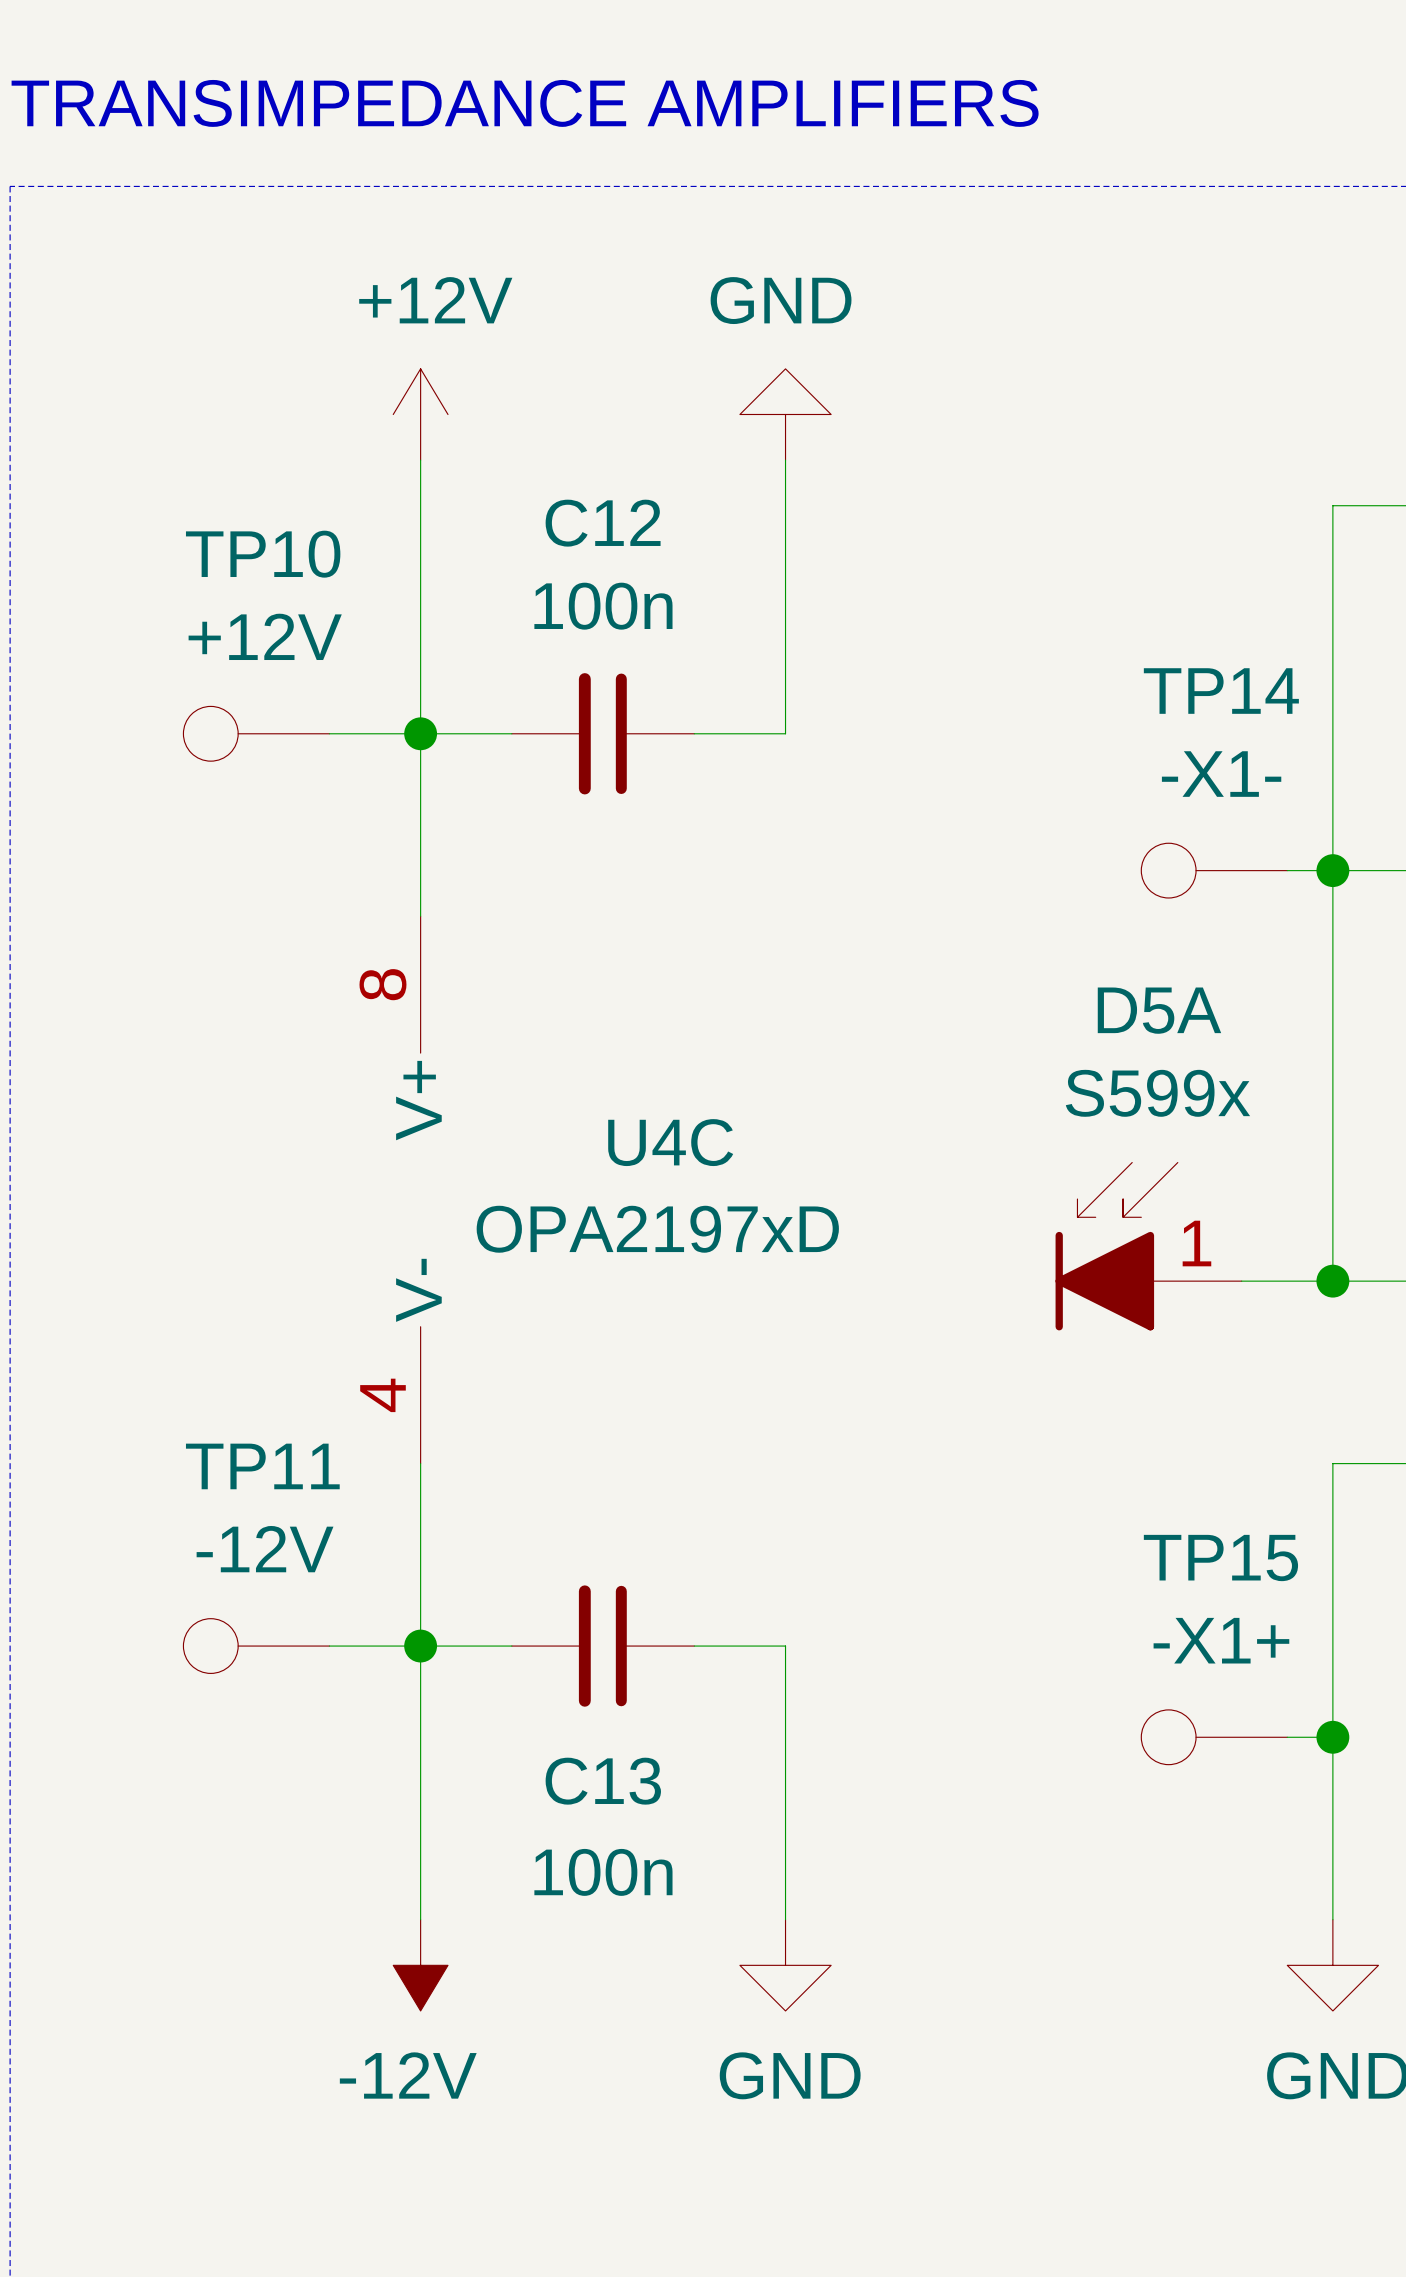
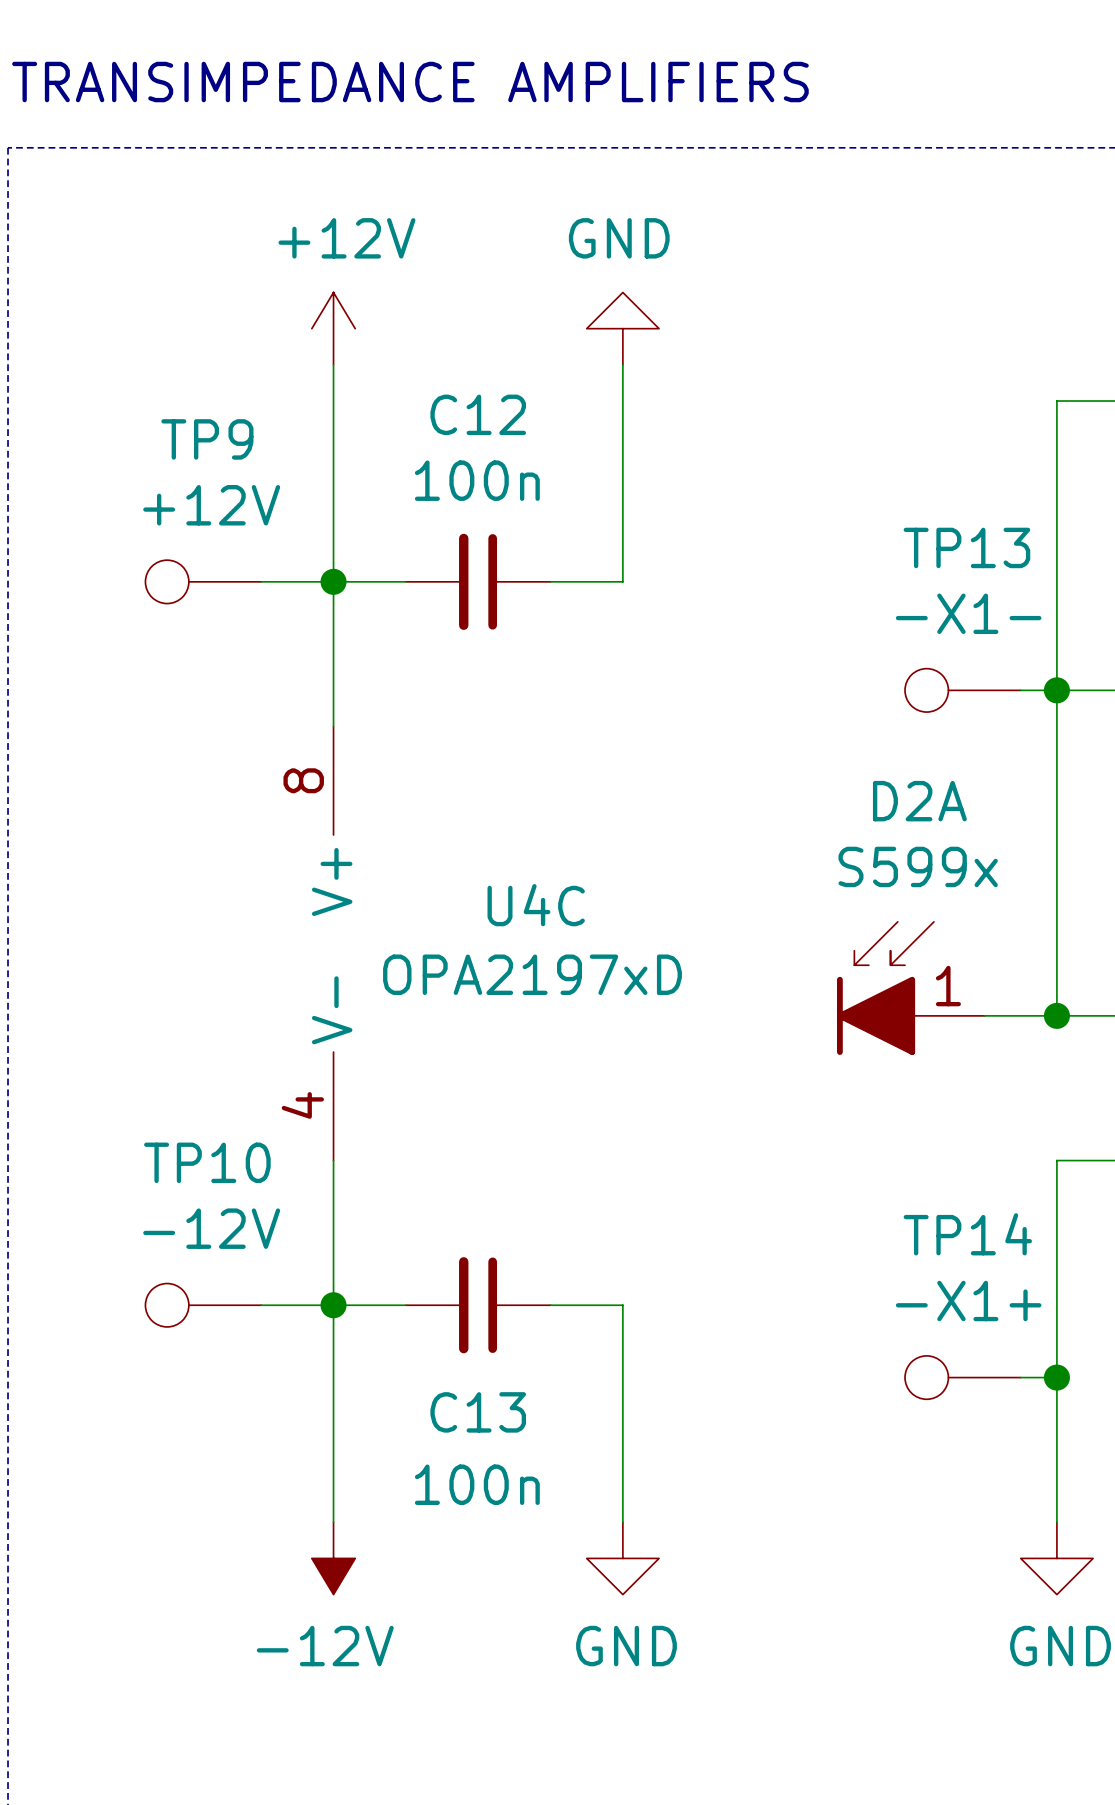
TP10 name: TP10 (263, 554) -> TP9 (207, 439)
TP14 name: TP14 (1221, 691) -> TP13 (966, 547)
D5A name: D5A (1159, 1010) -> D2A (919, 801)
TP11 name: TP11 (262, 1466) -> TP10 (207, 1162)
TP15 name: TP15 (1220, 1558) -> TP14 (967, 1234)

